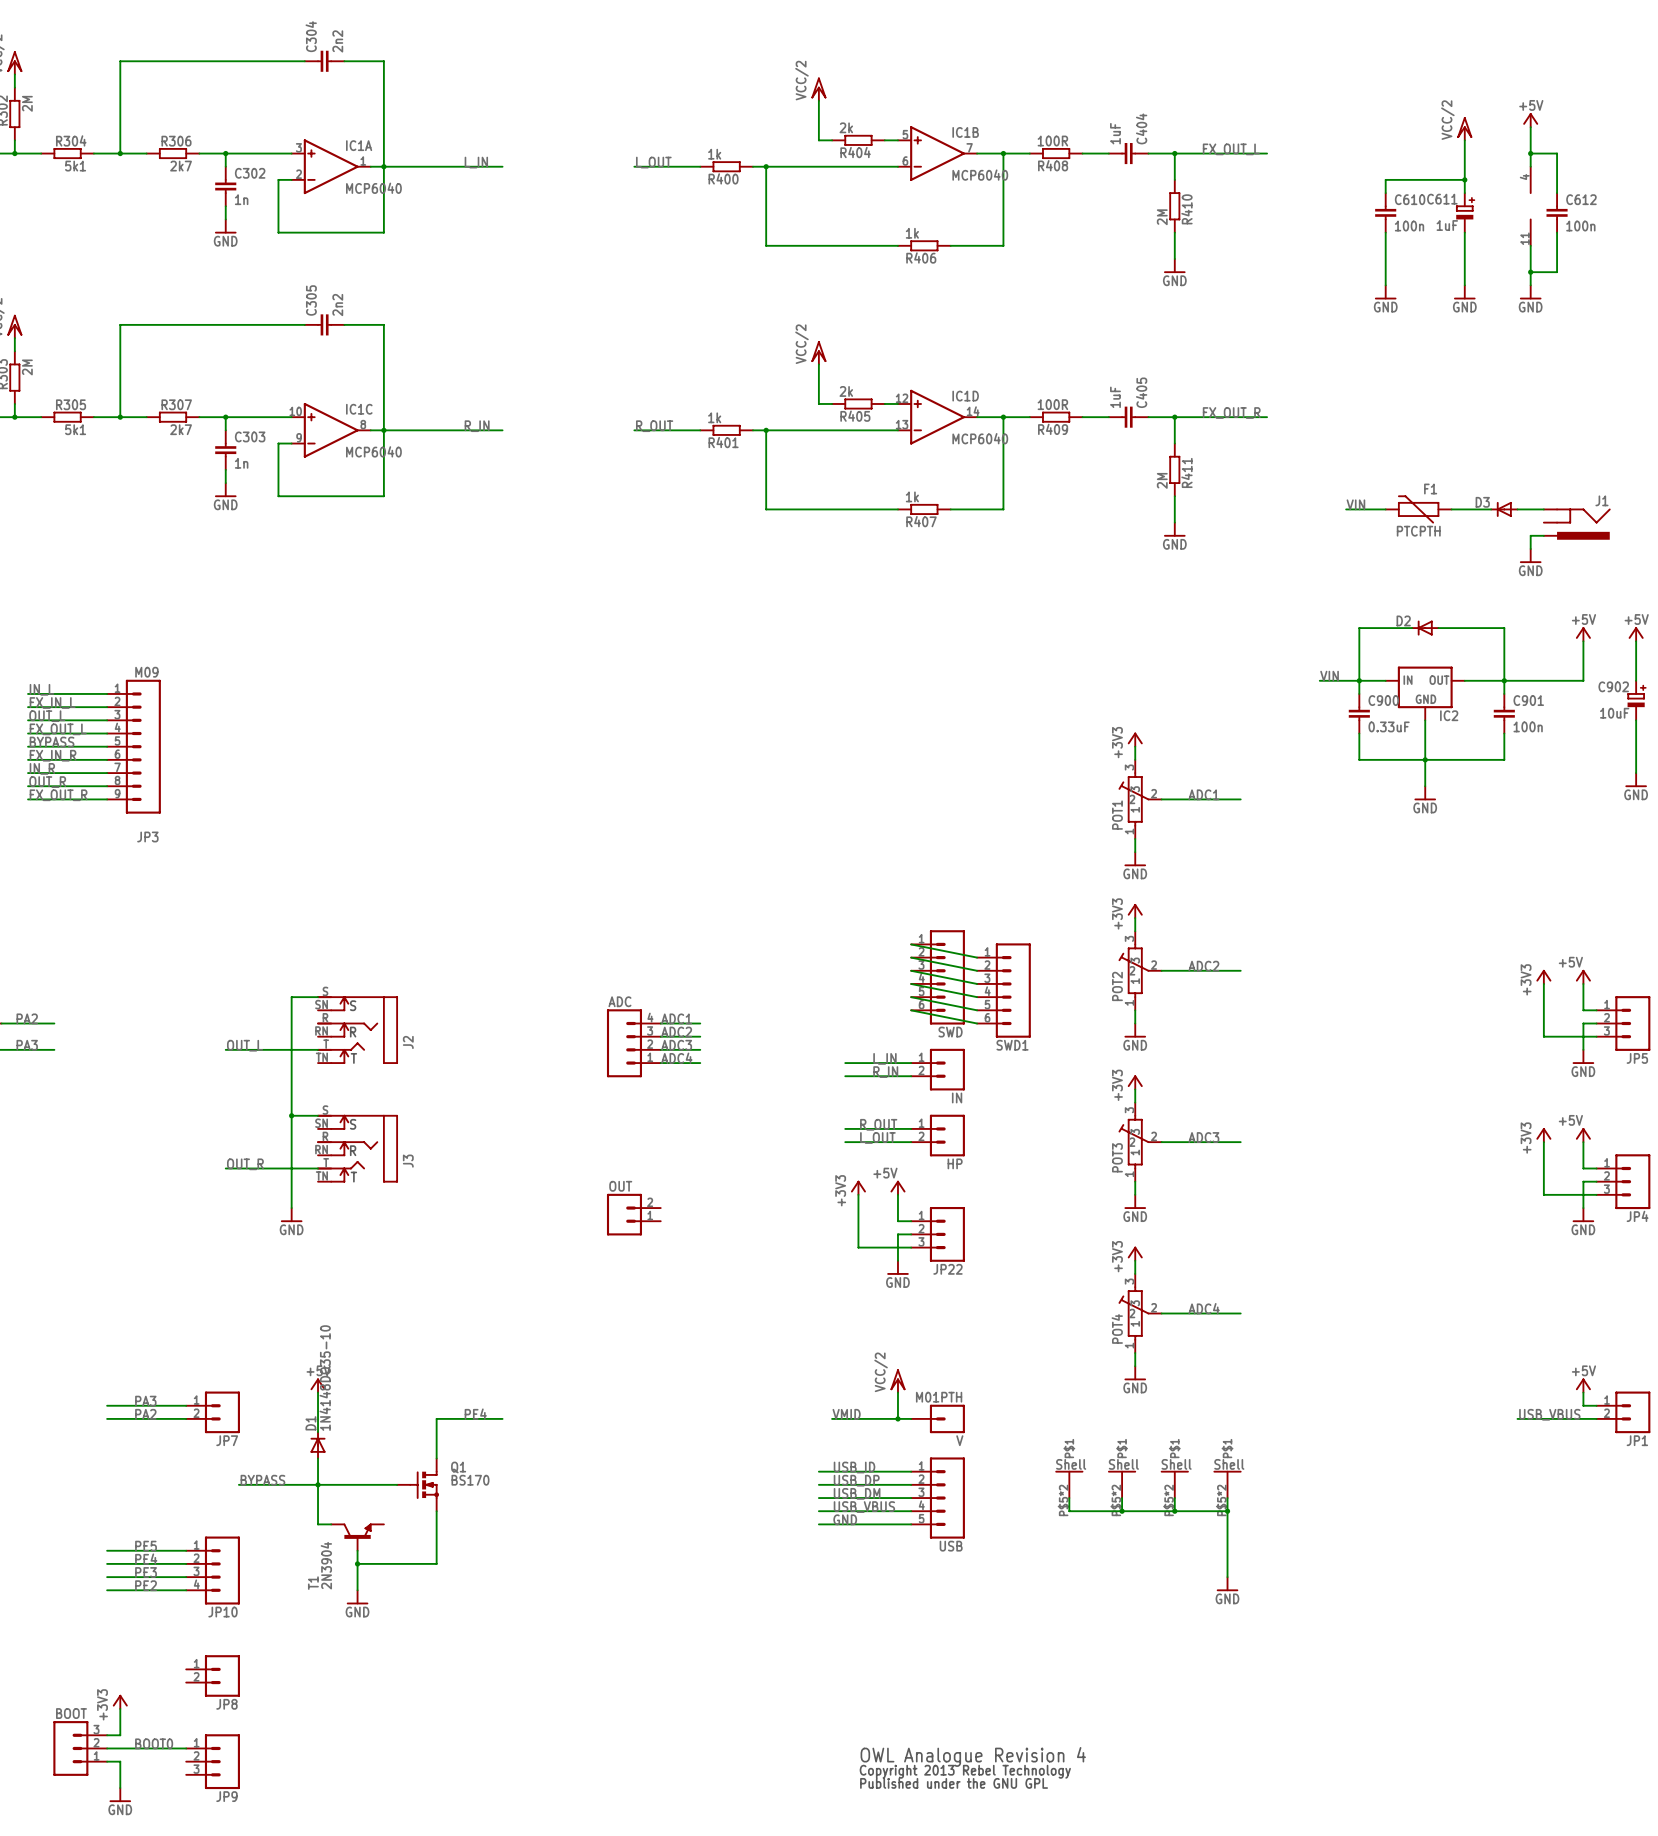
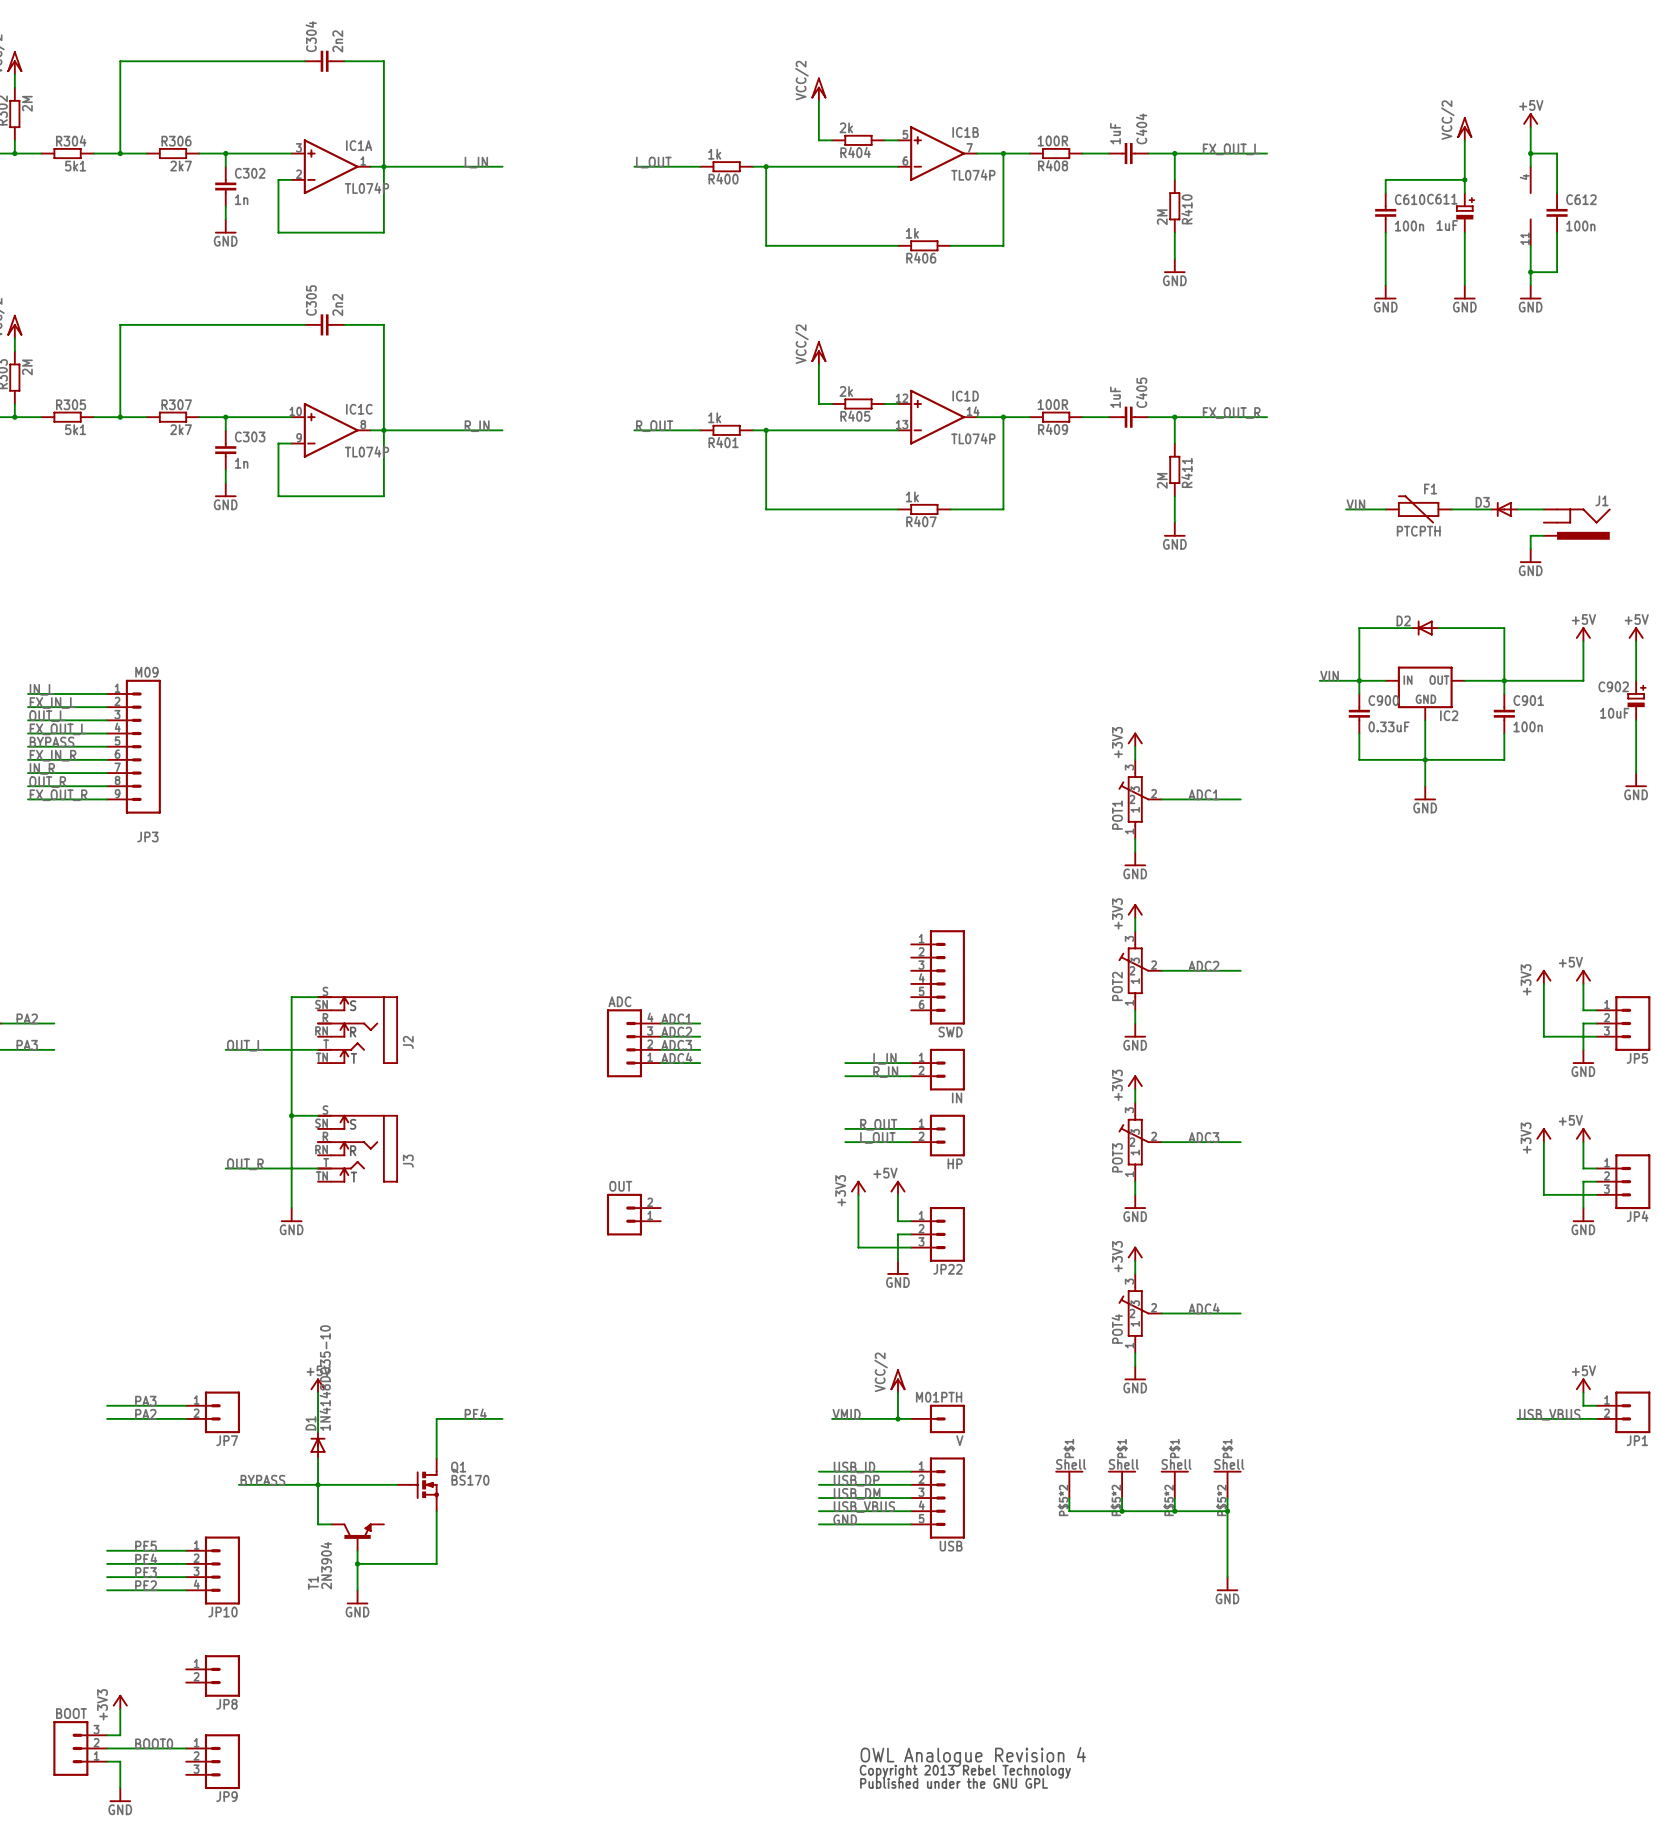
IC1B value: MCP6040 (980, 175) -> TL074P (973, 175)
IC1A value: MCP6040 (373, 188) -> TL074P (367, 188)
IC1D value: MCP6040 (980, 438) -> TL074P (973, 438)
IC1C value: MCP6040 (373, 451) -> TL074P (367, 451)
wire: (911, 944) (977, 957) -> none
wire: (911, 957) (977, 970) -> none
wire: (911, 970) (977, 983) -> none
wire: (911, 983) (977, 997) -> none
SWD1: (1003, 990) -> none
wire: (911, 997) (977, 1010) -> none
wire: (911, 1010) (977, 1023) -> none

